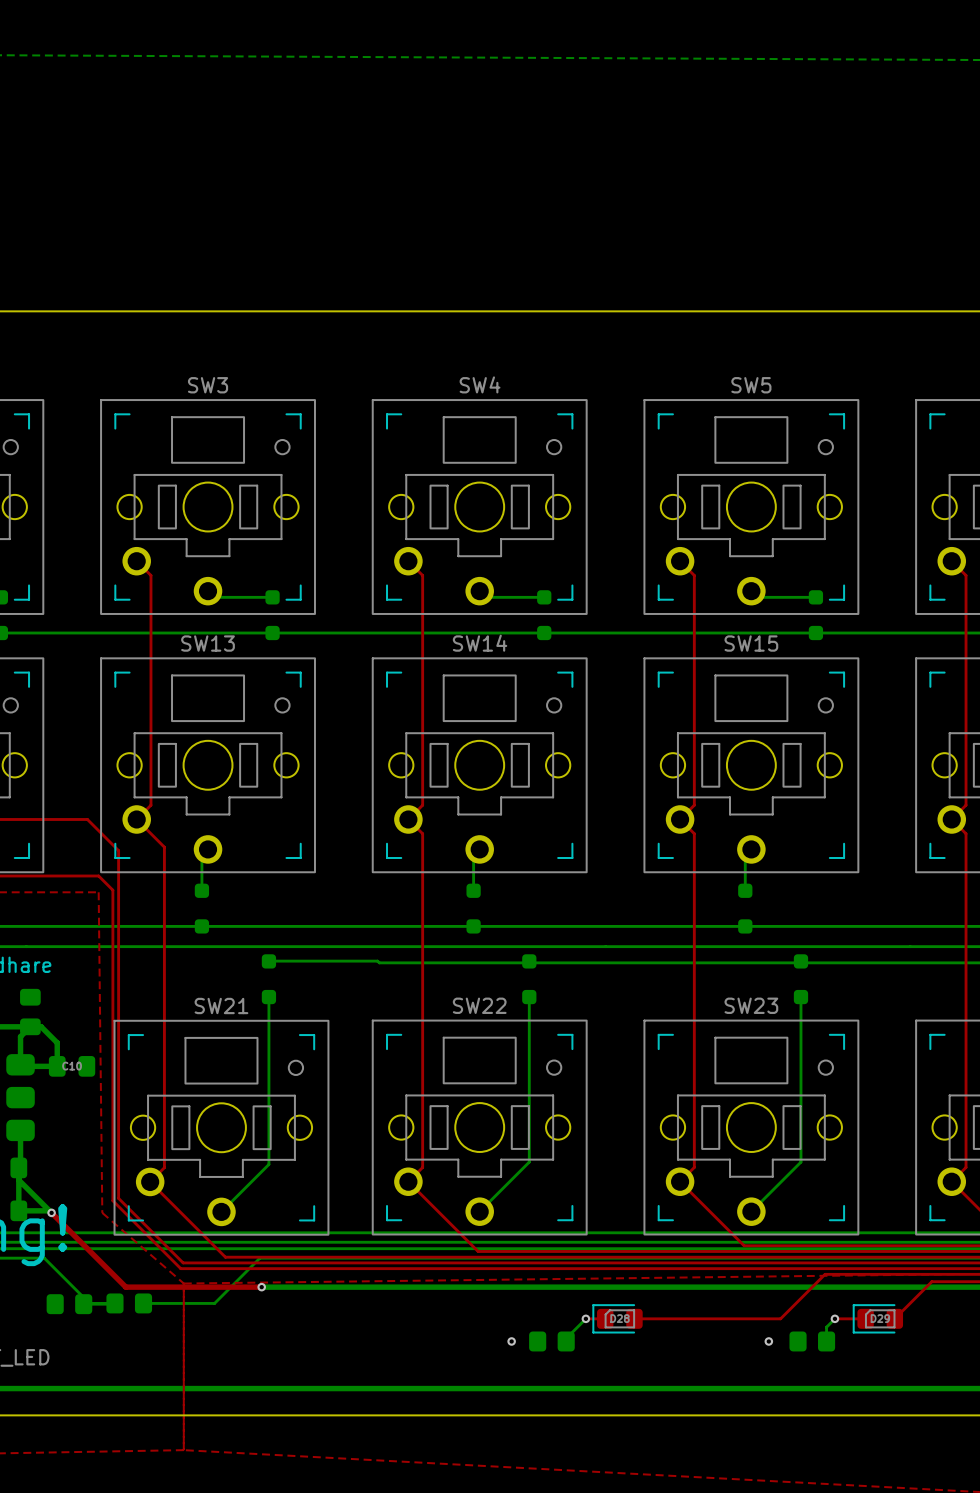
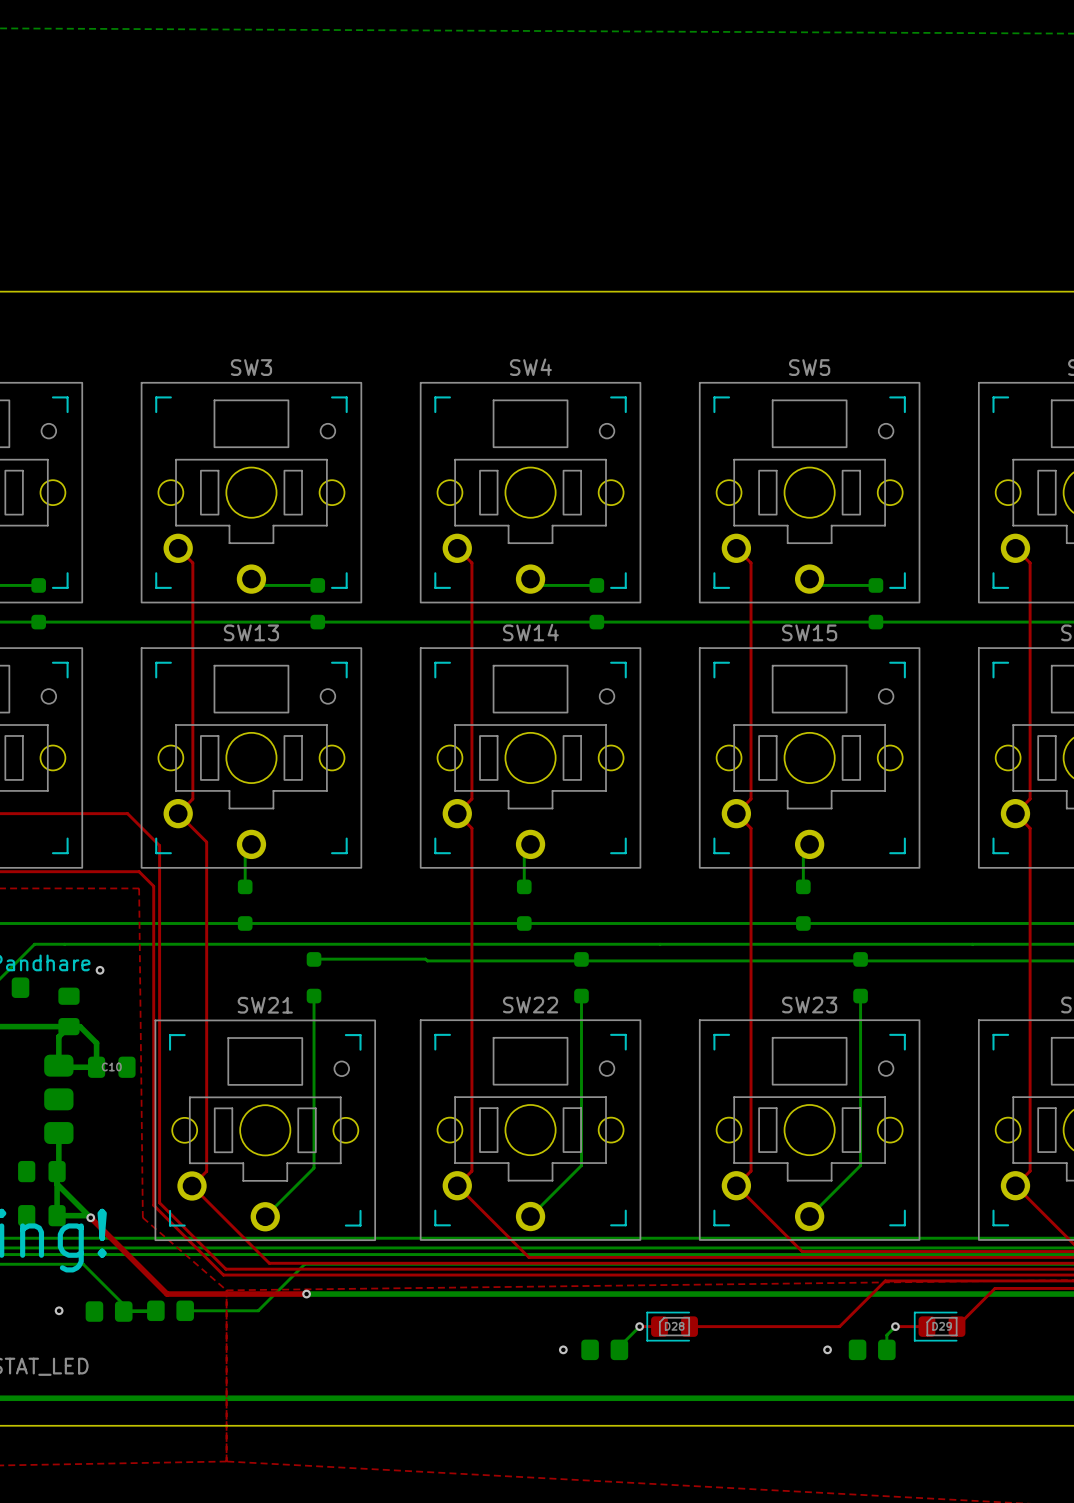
via: none -> (100, 970)
via: none -> (59, 1310)

